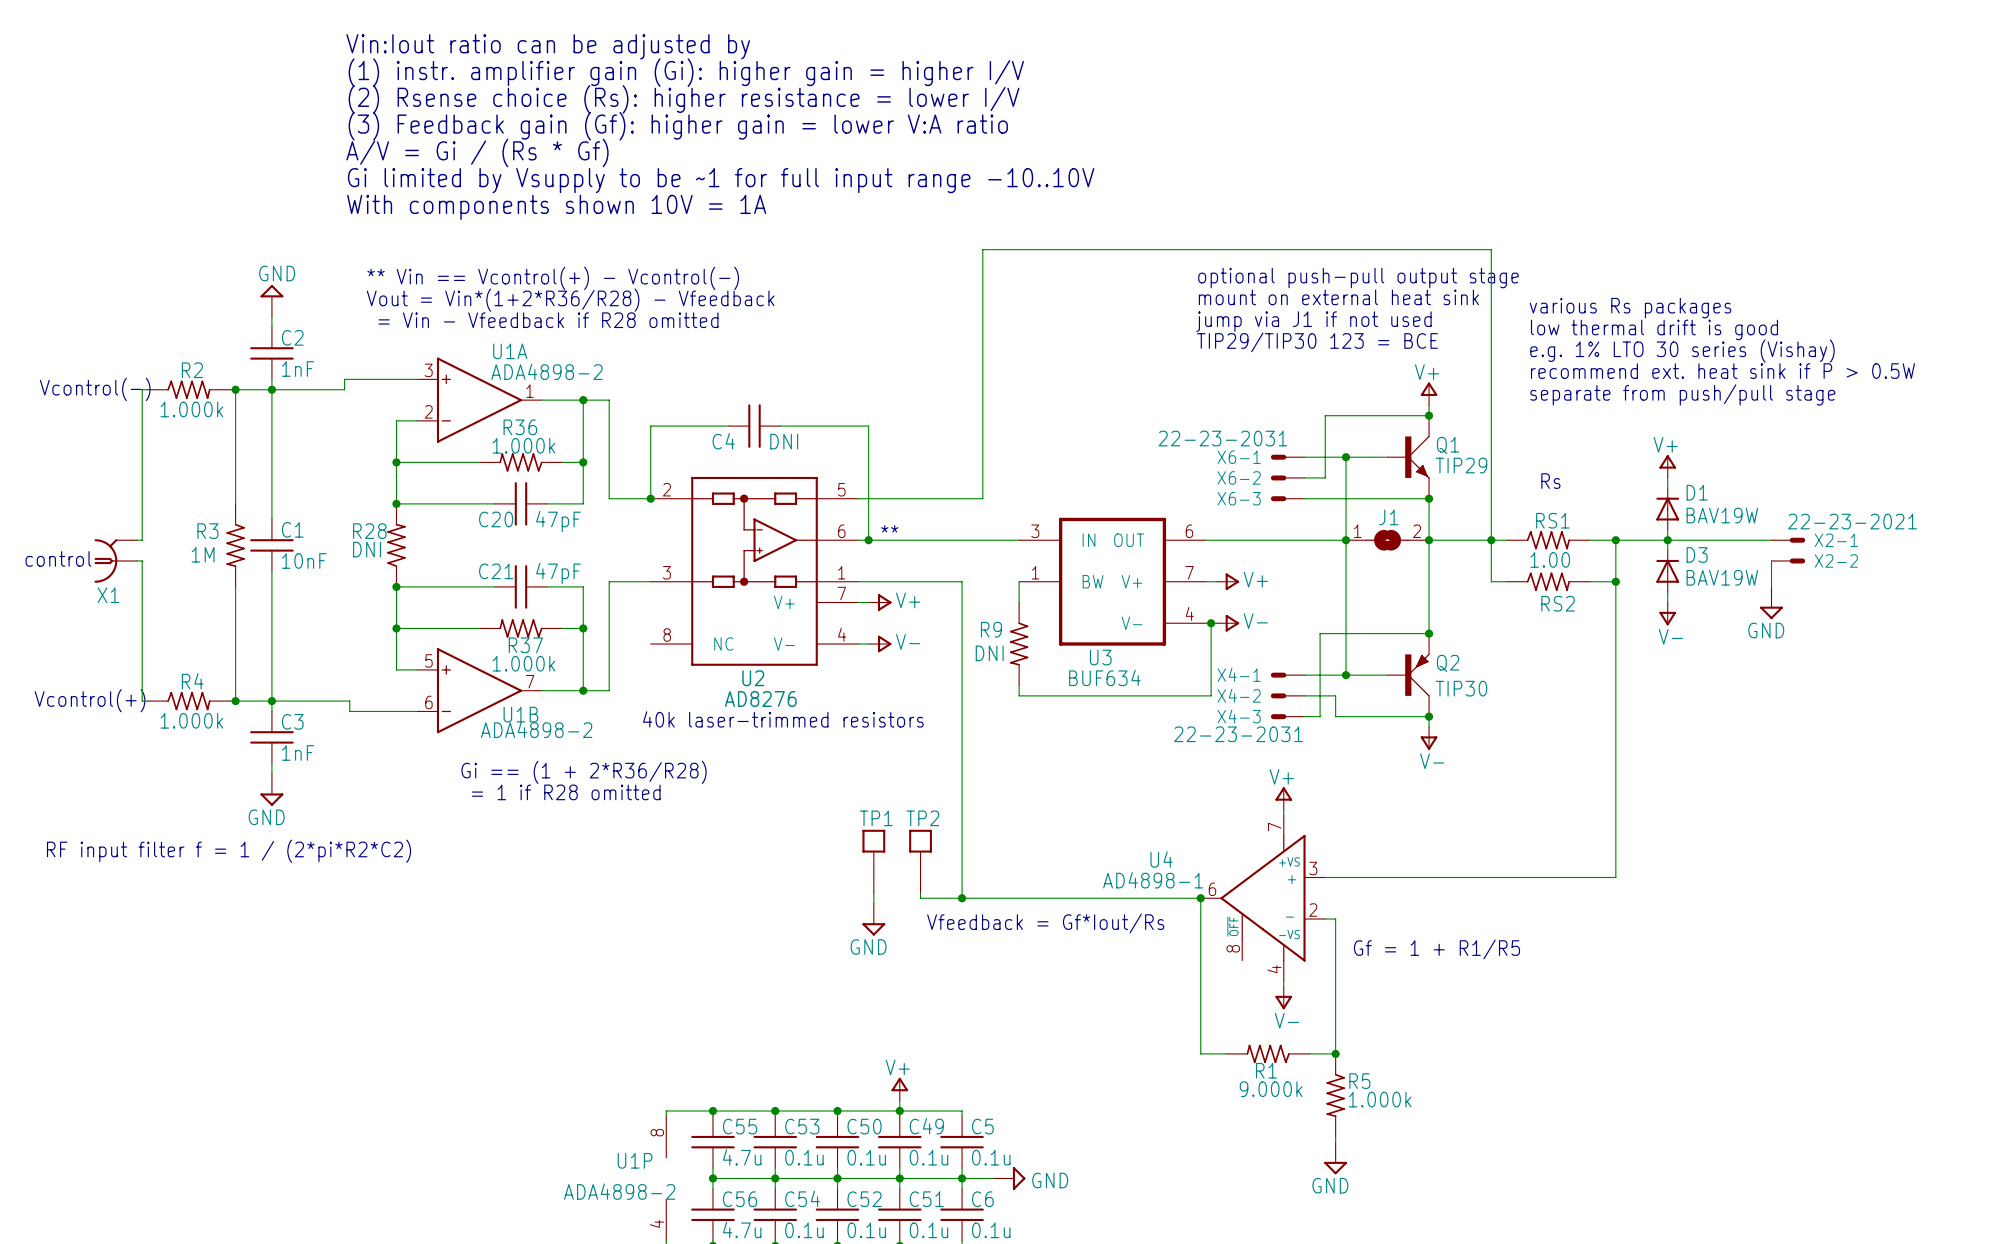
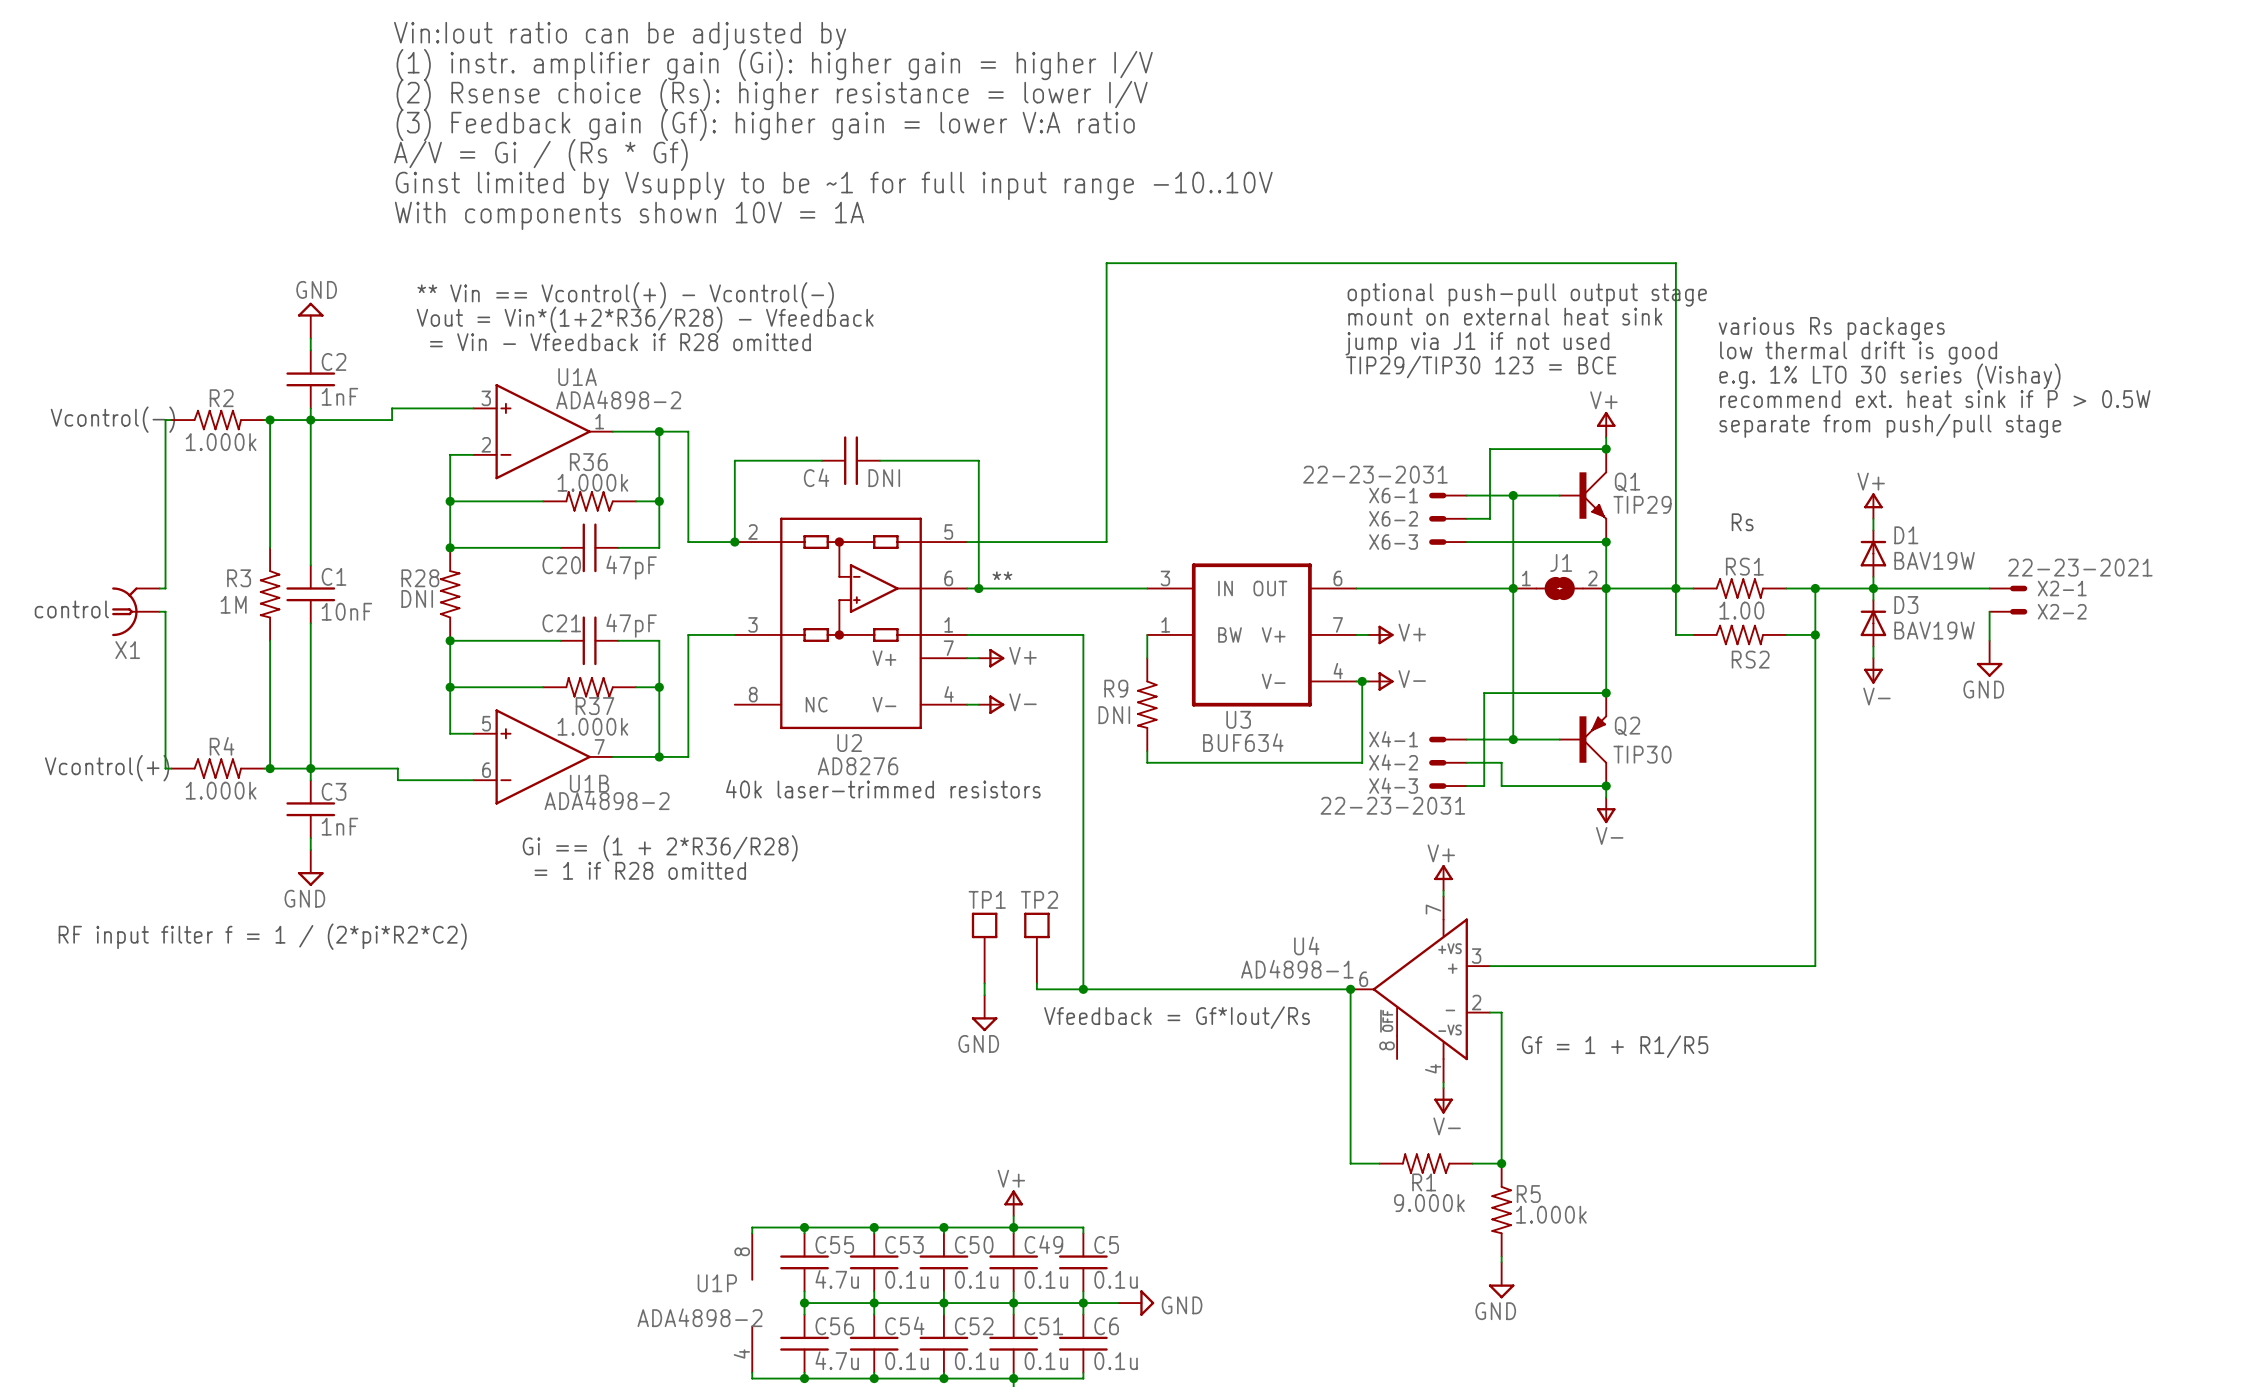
text: Gi limited by Vsupply to be ~1 for full input range -10..10V (721, 180) -> Ginst limited by Vsupply to be ~1 for full input range -10..10V (834, 185)

